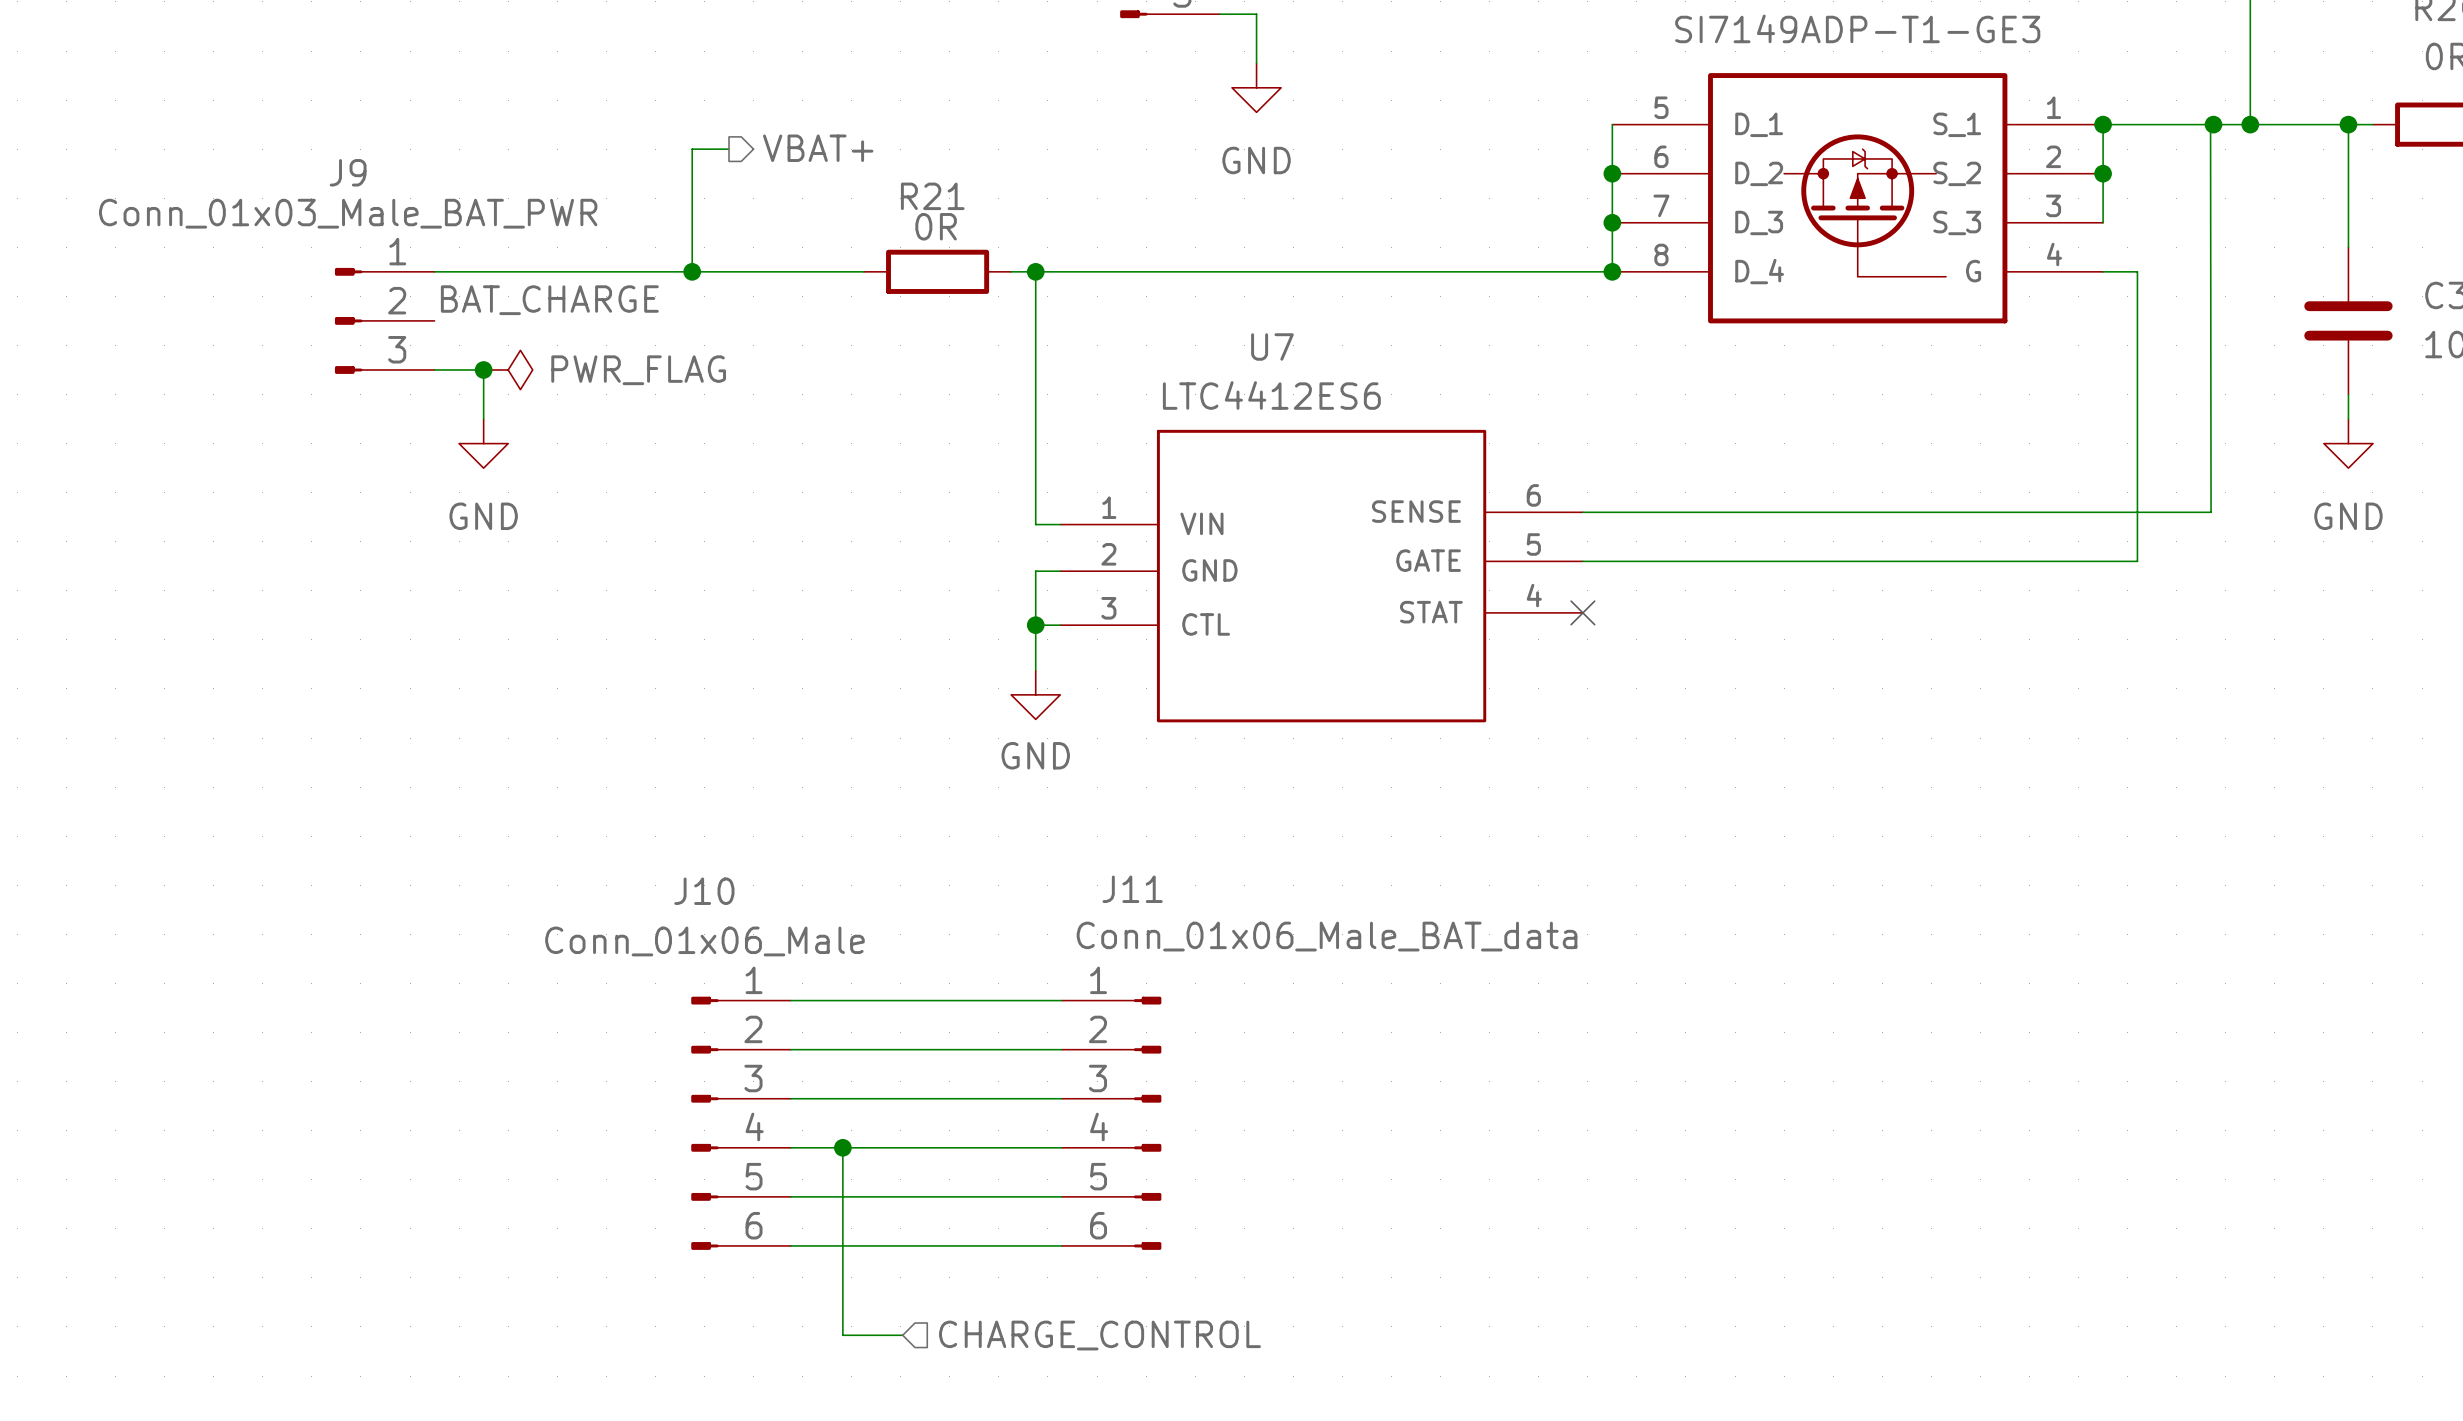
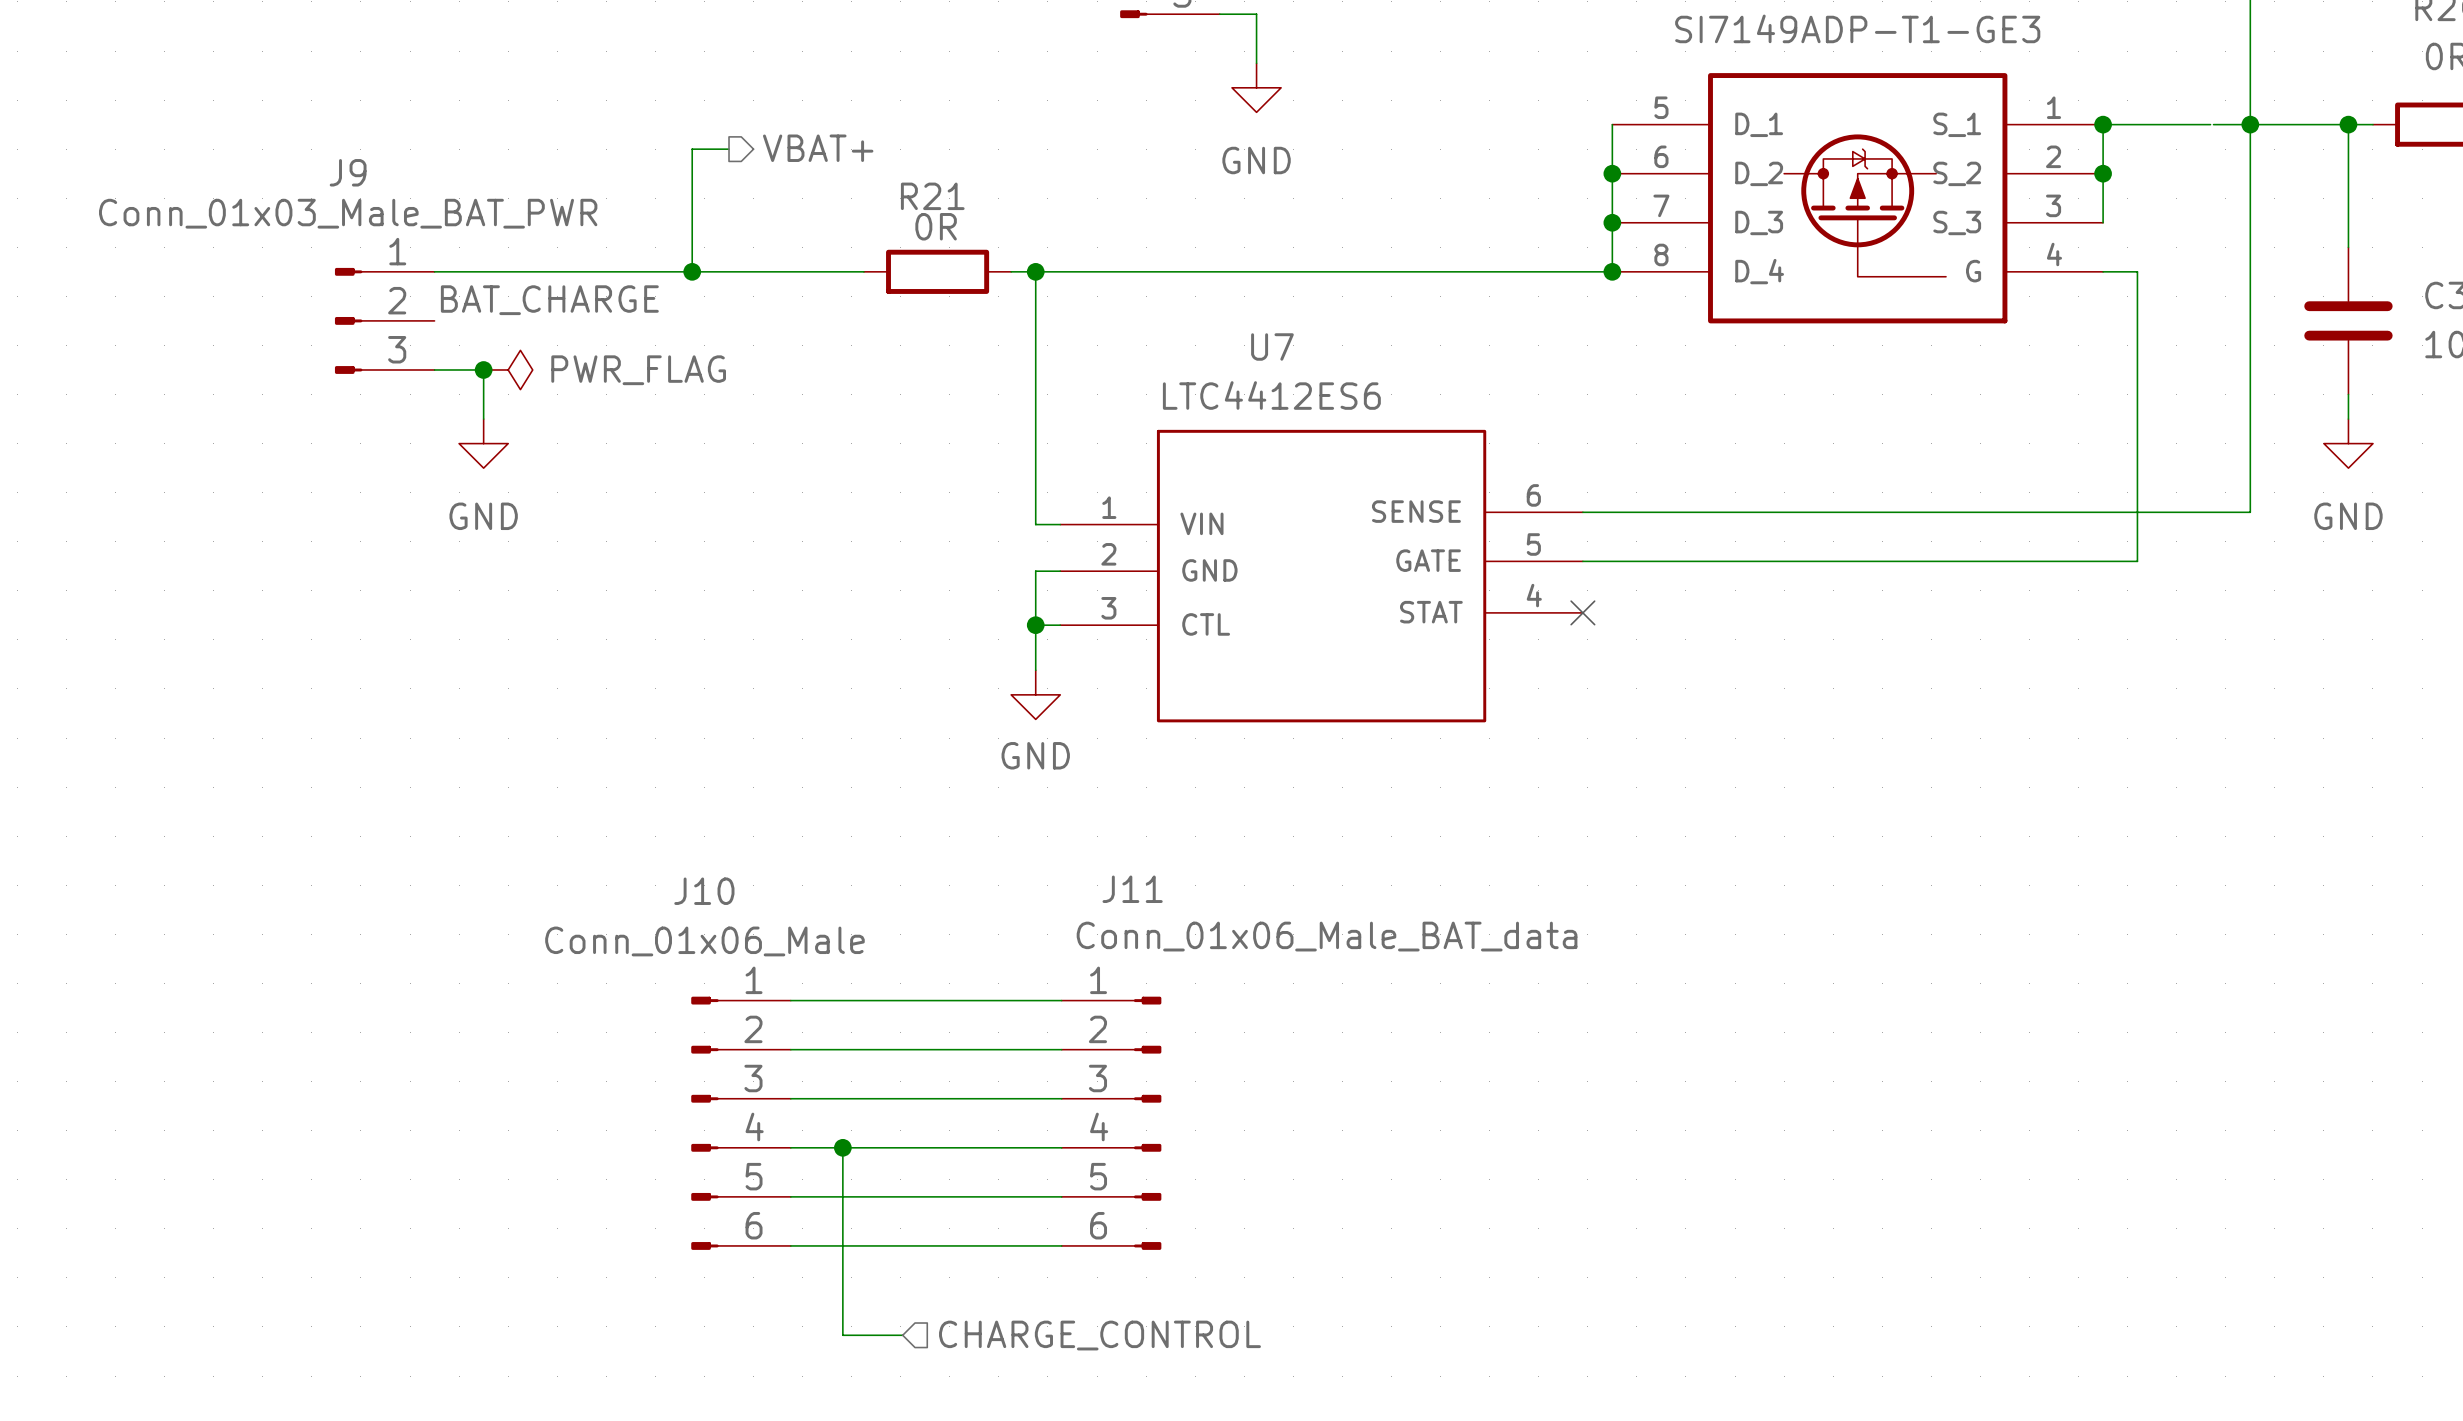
wire: (2210, 124) (2211, 512) -> (2250, 124) (2250, 512) (2211, 512)
junction: (2213, 124) -> none

